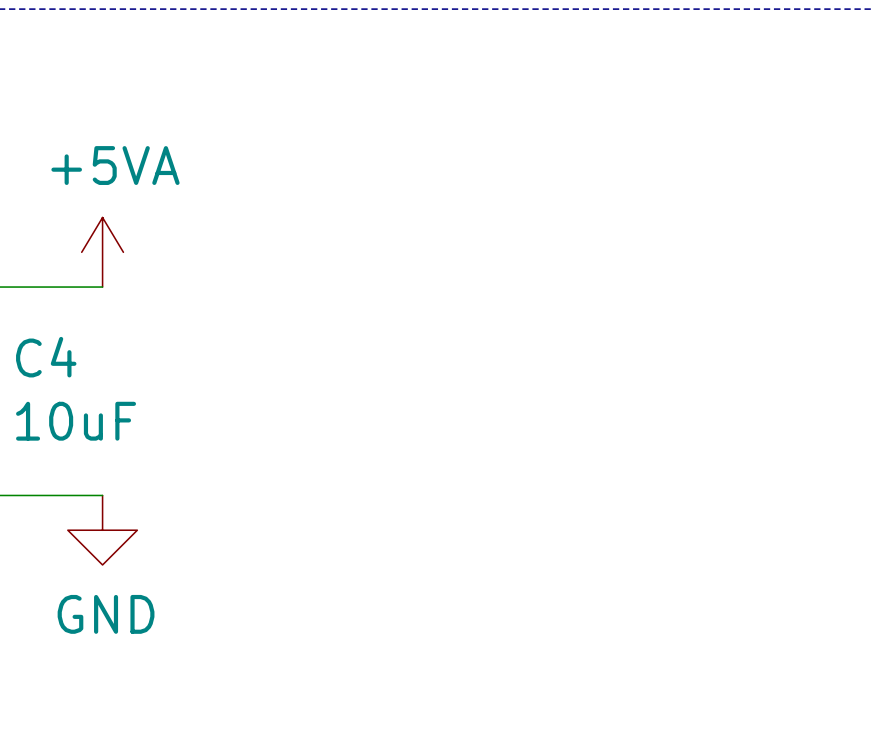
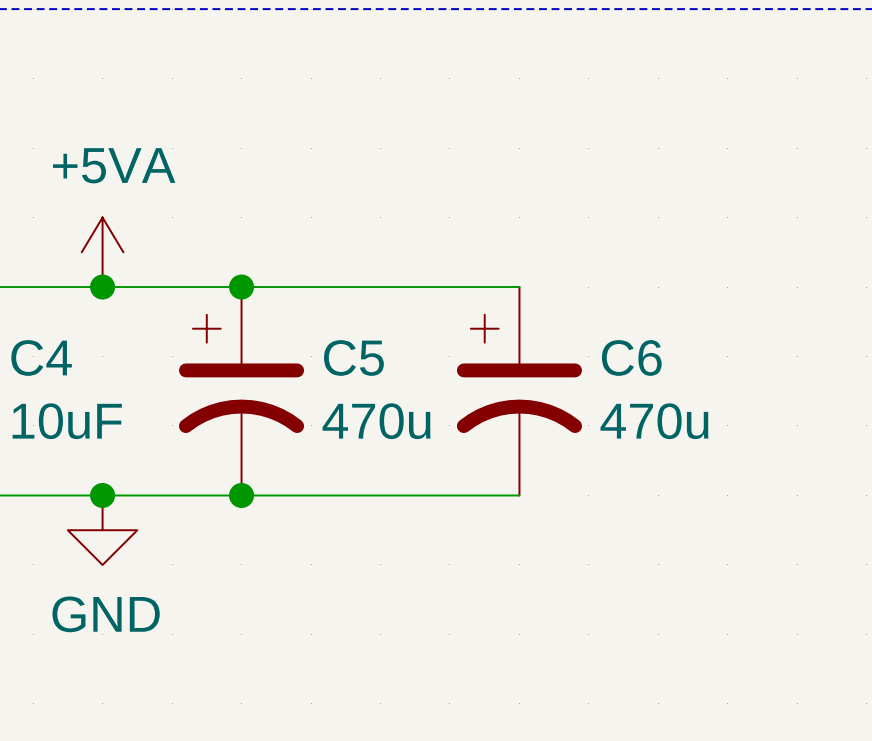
wire: none -> (102, 287) (519, 287)
junction: none -> (102, 287)
junction: none -> (241, 287)
C5: none -> 470u (241, 391)
C6: none -> 470u (519, 391)
wire: none -> (102, 495) (519, 495)
junction: none -> (102, 495)
junction: none -> (241, 495)

